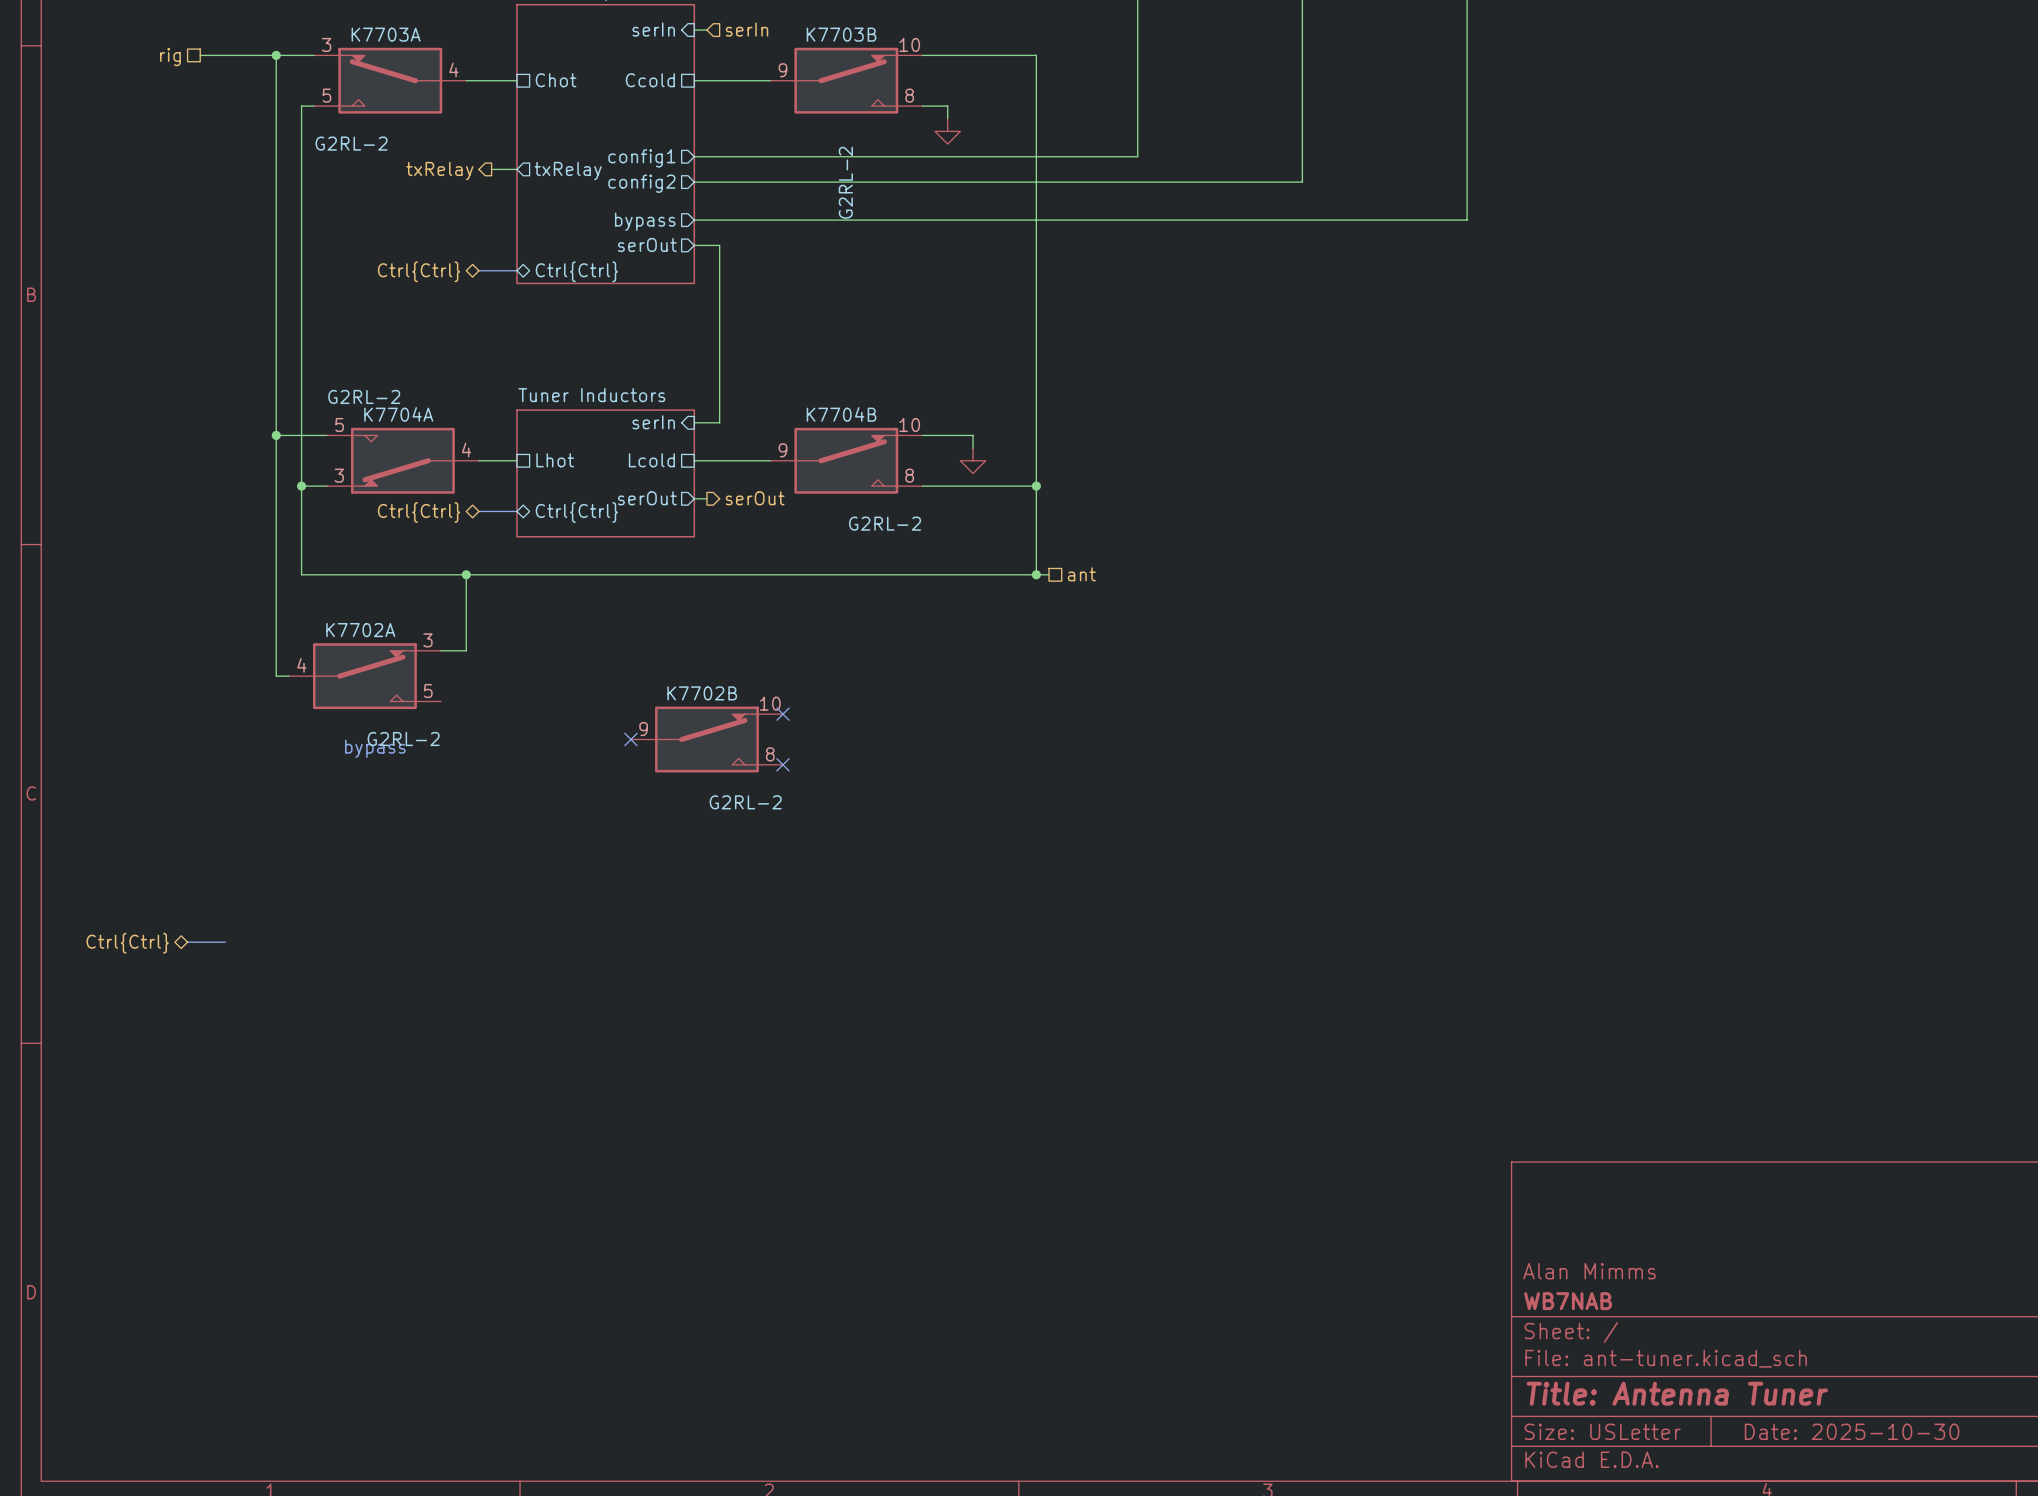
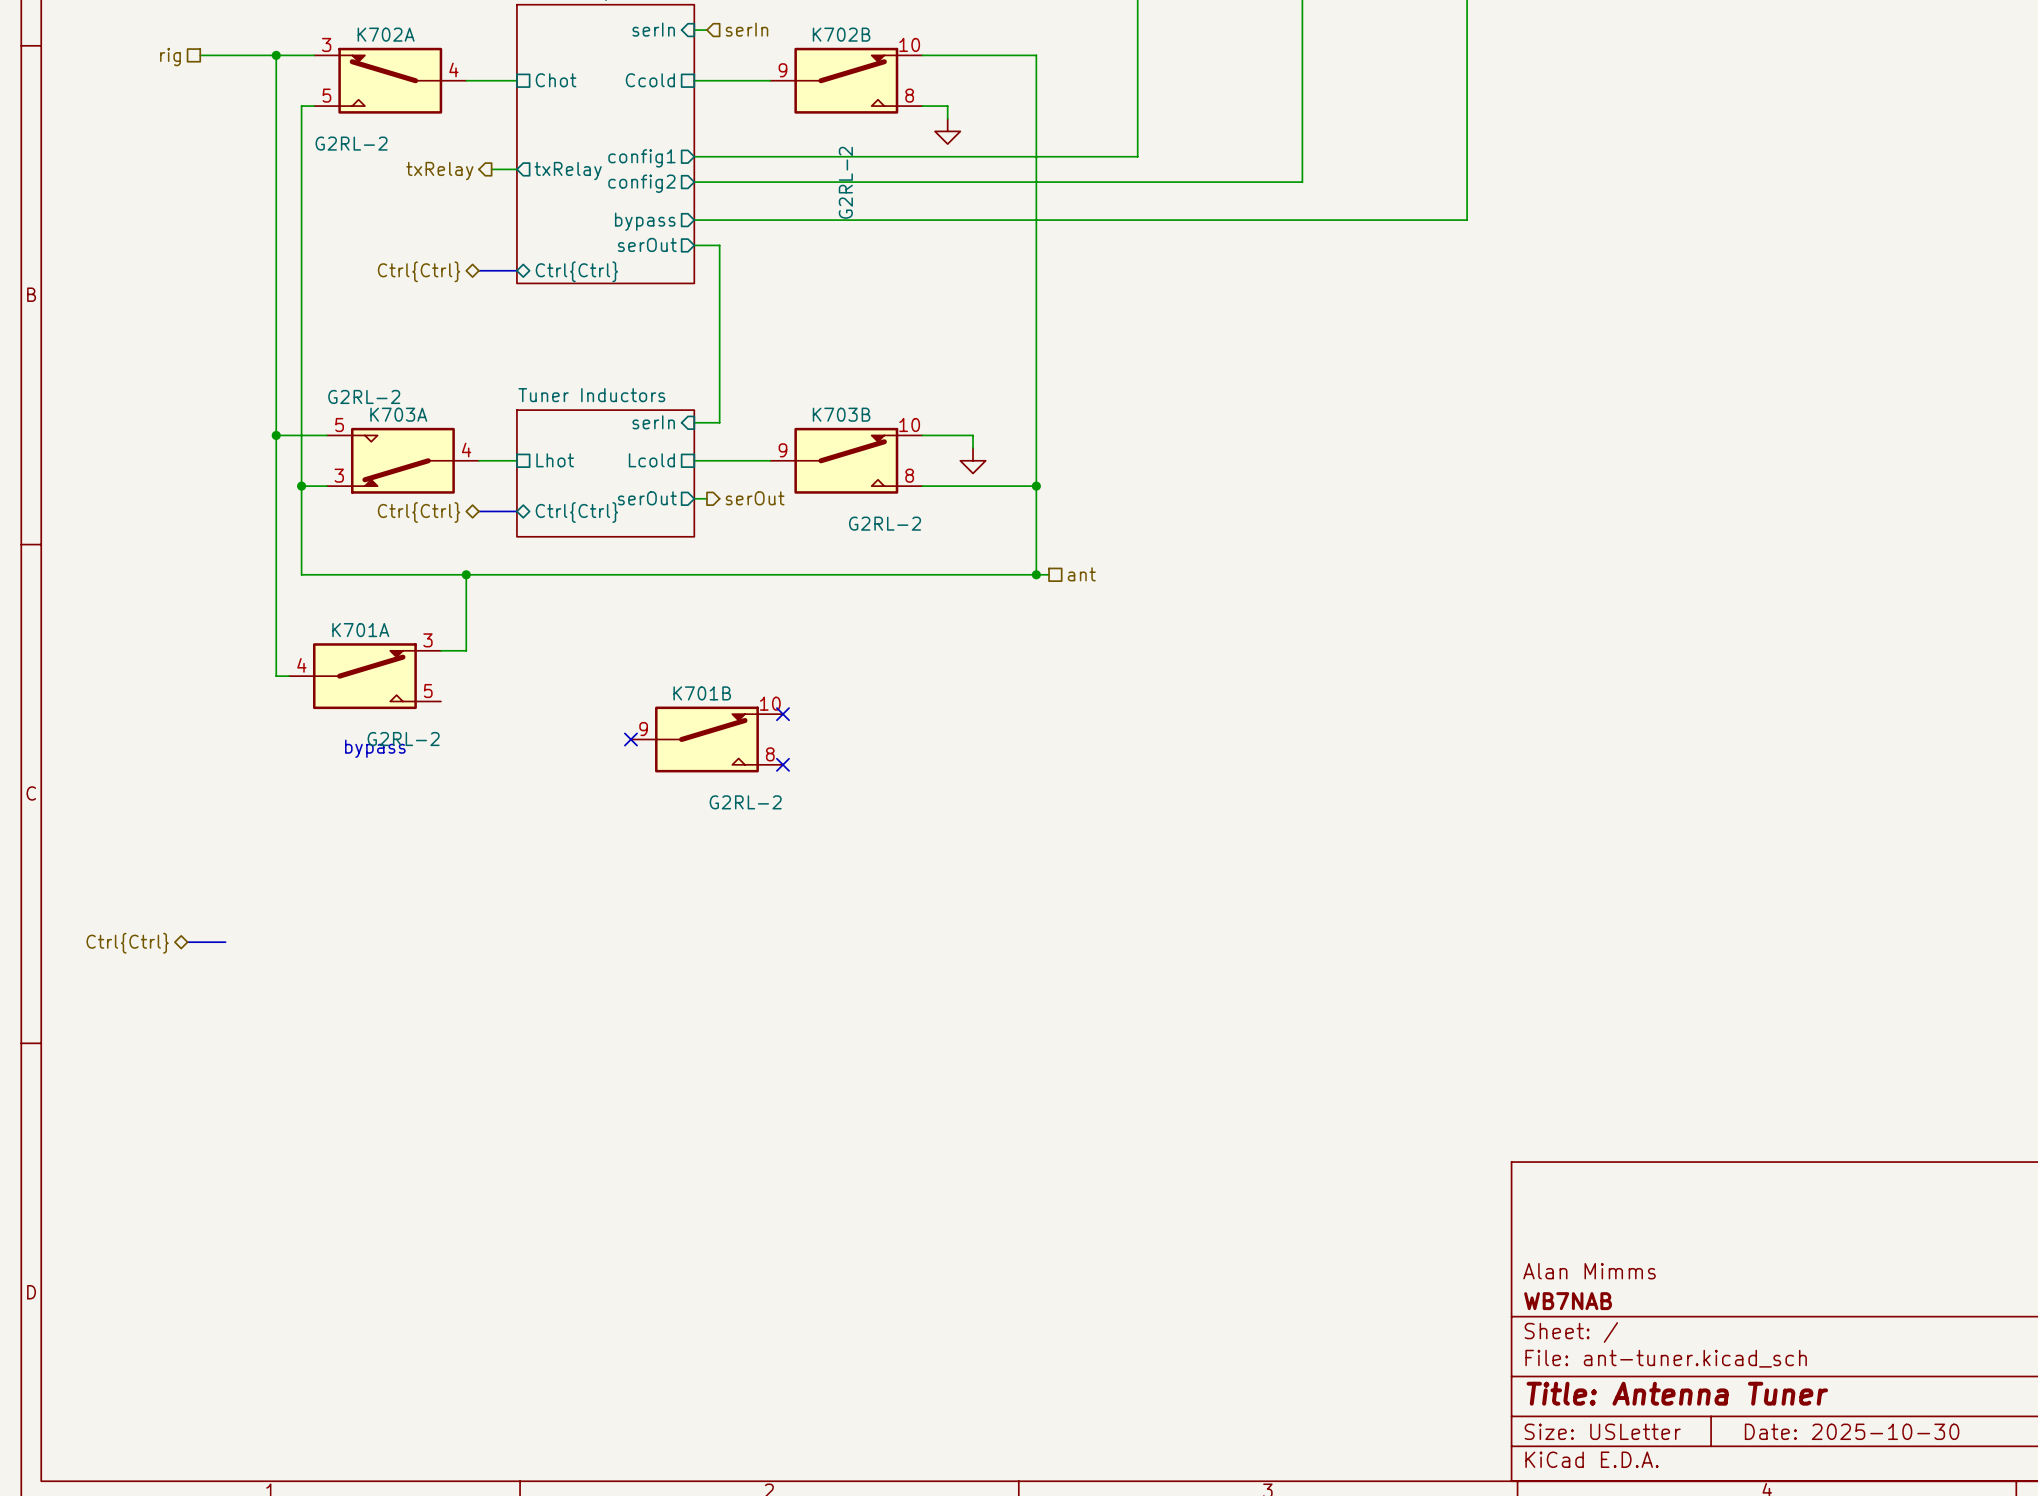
K7703A name: K7703A (386, 34) -> K702A (386, 34)
K7703B name: K7703B (841, 34) -> K702B (841, 34)
K7704A name: K7704A (398, 414) -> K703A (398, 414)
K7704B name: K7704B (841, 414) -> K703B (841, 414)
K7702A name: K7702A (360, 630) -> K701A (360, 630)
K7702B name: K7702B (702, 693) -> K701B (702, 693)

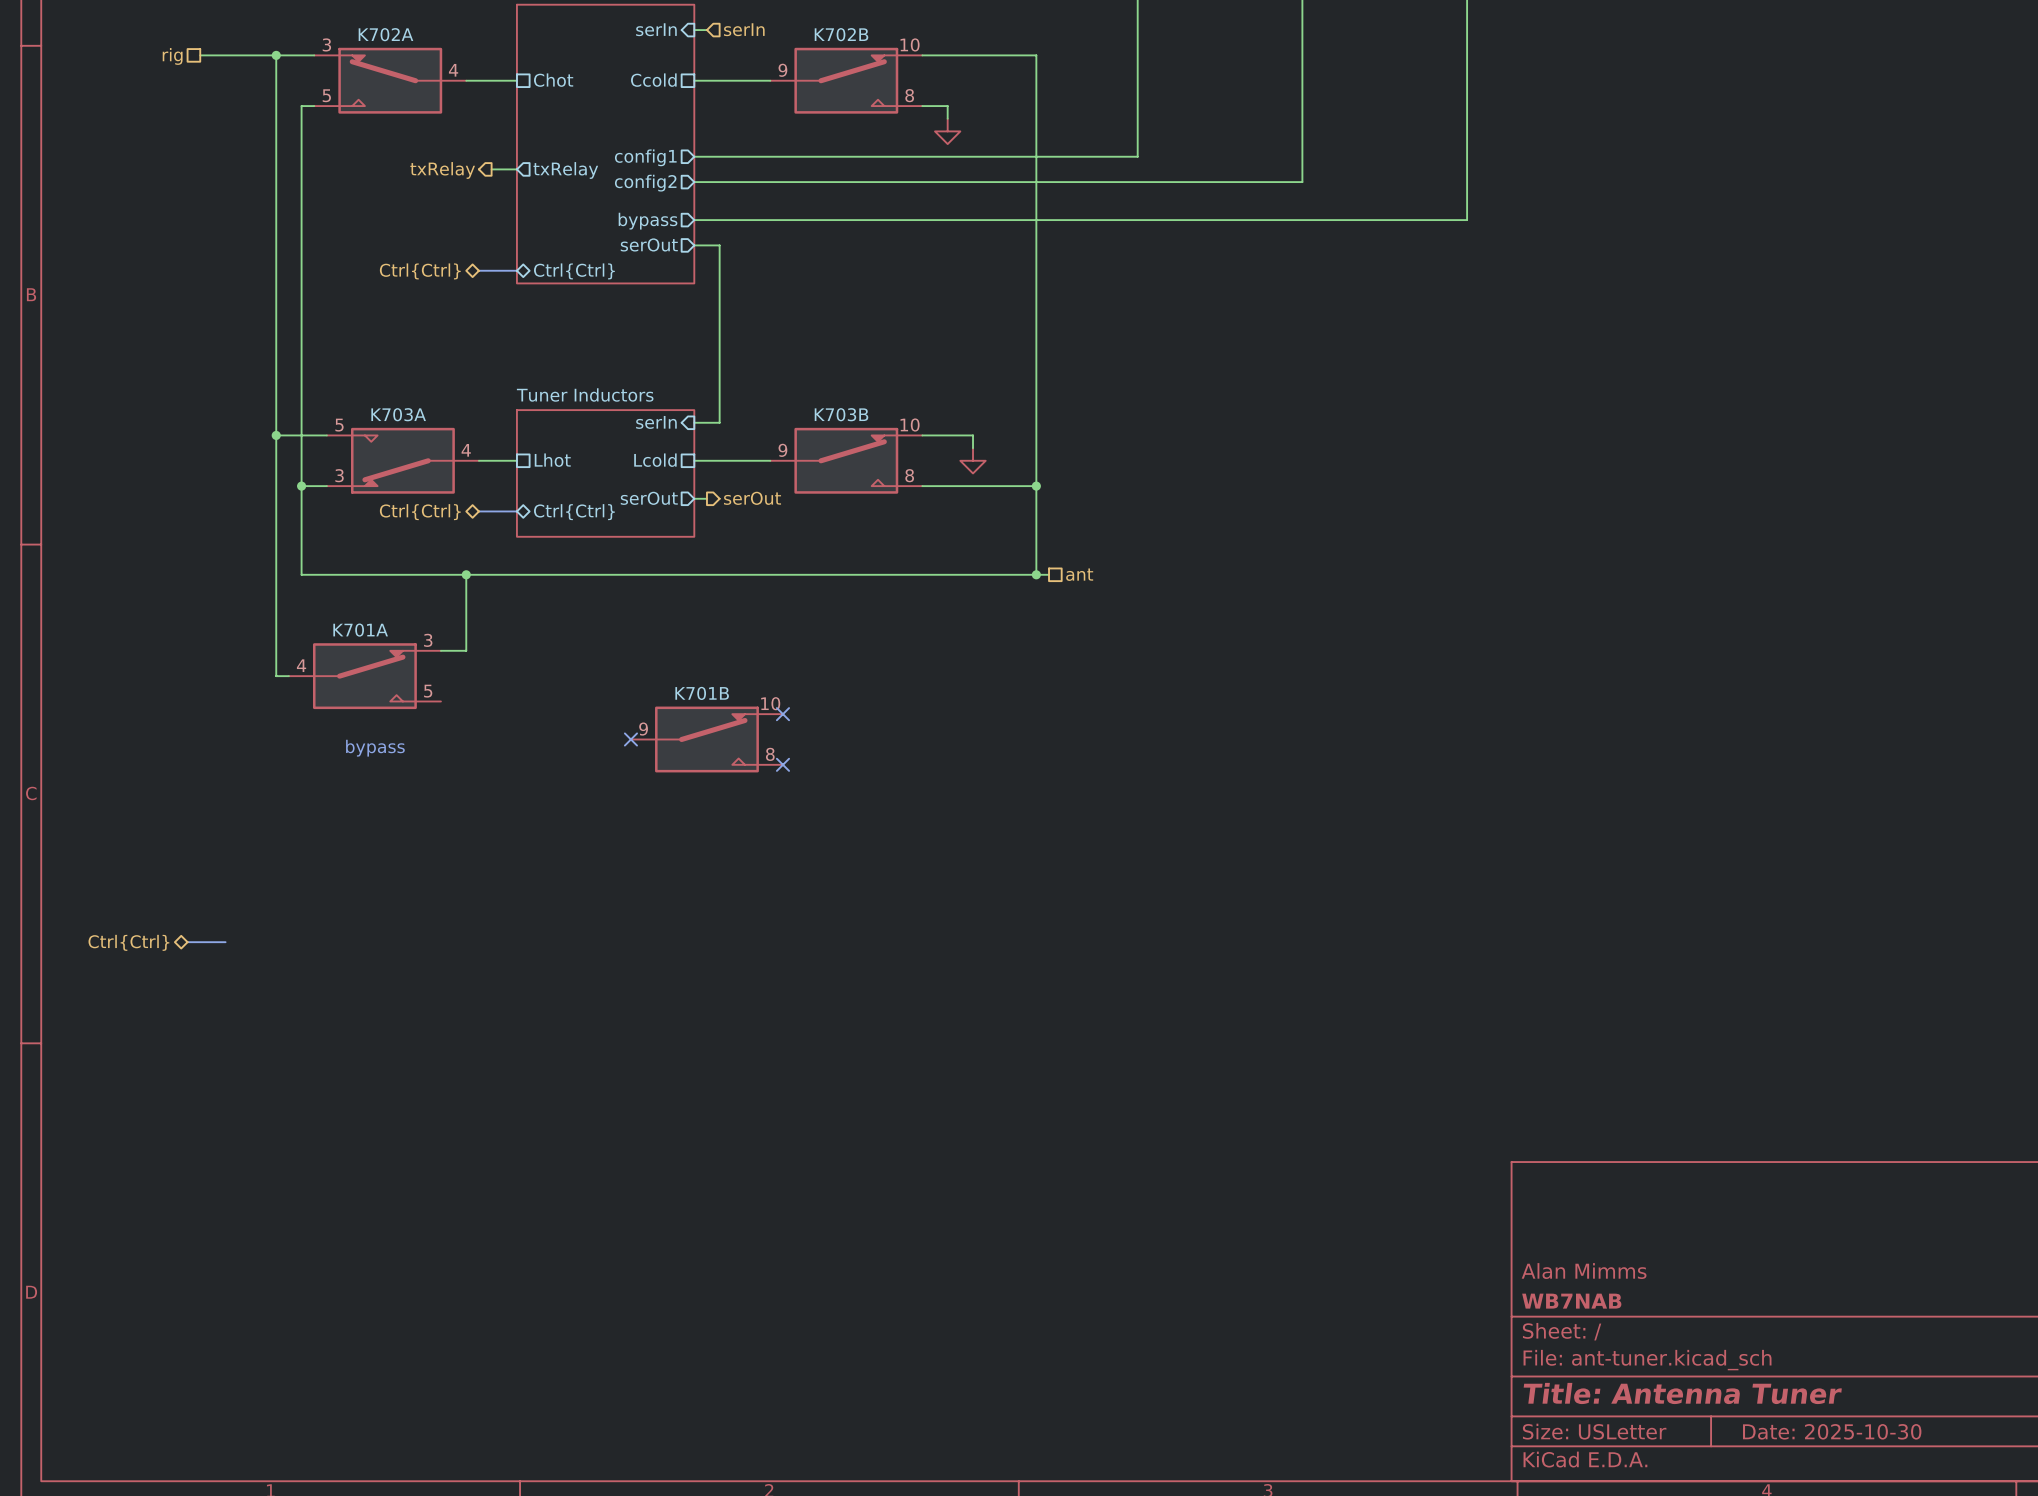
K702A value: G2RL-2 (351, 143) -> none
K702B value: G2RL-2 (845, 182) -> none
K703A value: G2RL-2 (364, 396) -> none
K703B value: G2RL-2 (885, 523) -> none
K701A value: G2RL-2 (403, 739) -> none
K701B value: G2RL-2 (745, 802) -> none

